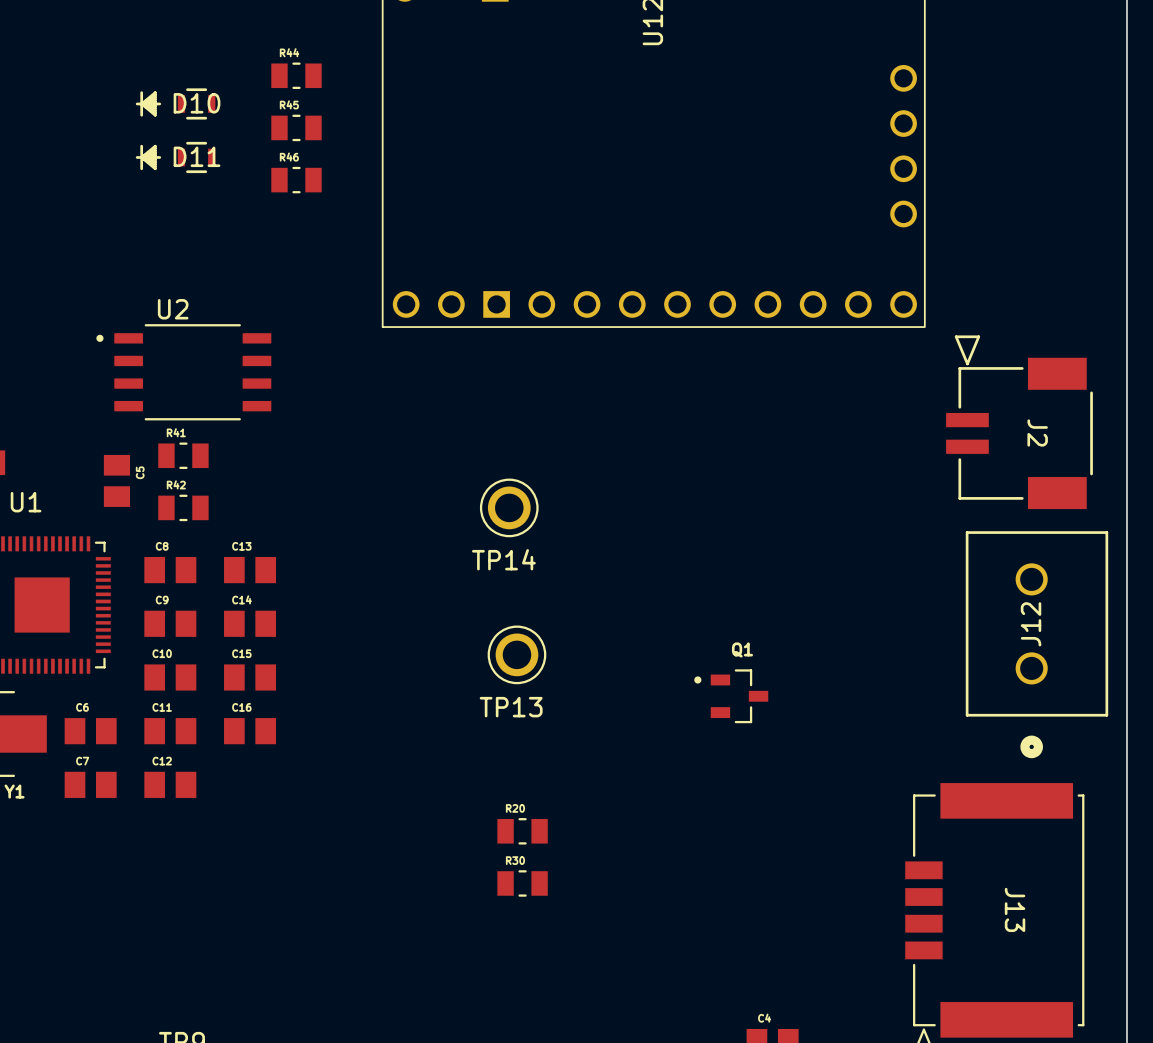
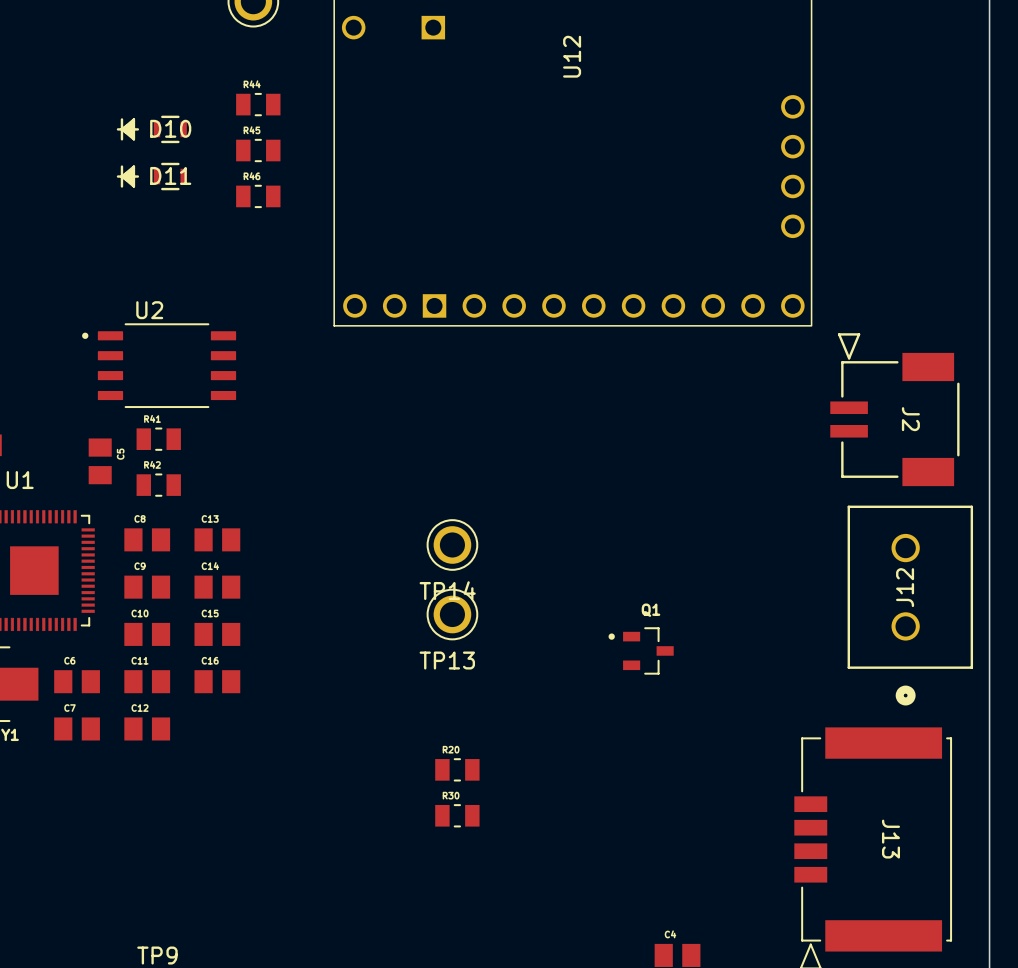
TP14 position: (509, 507) -> (452, 544)

